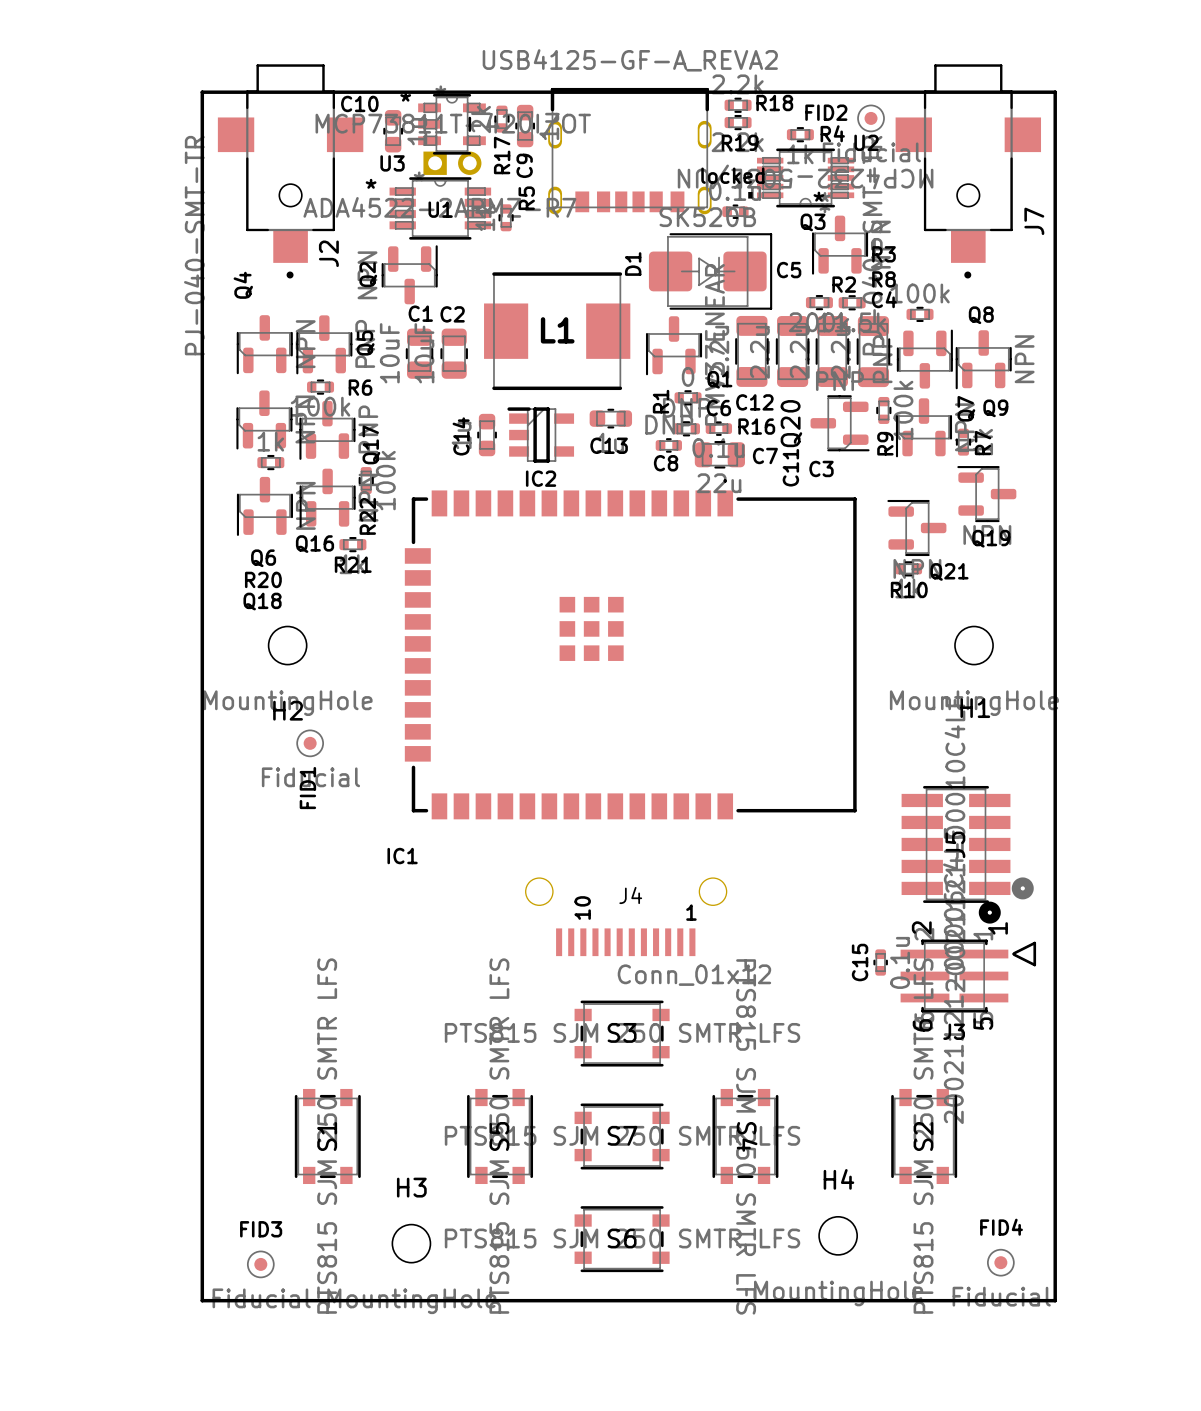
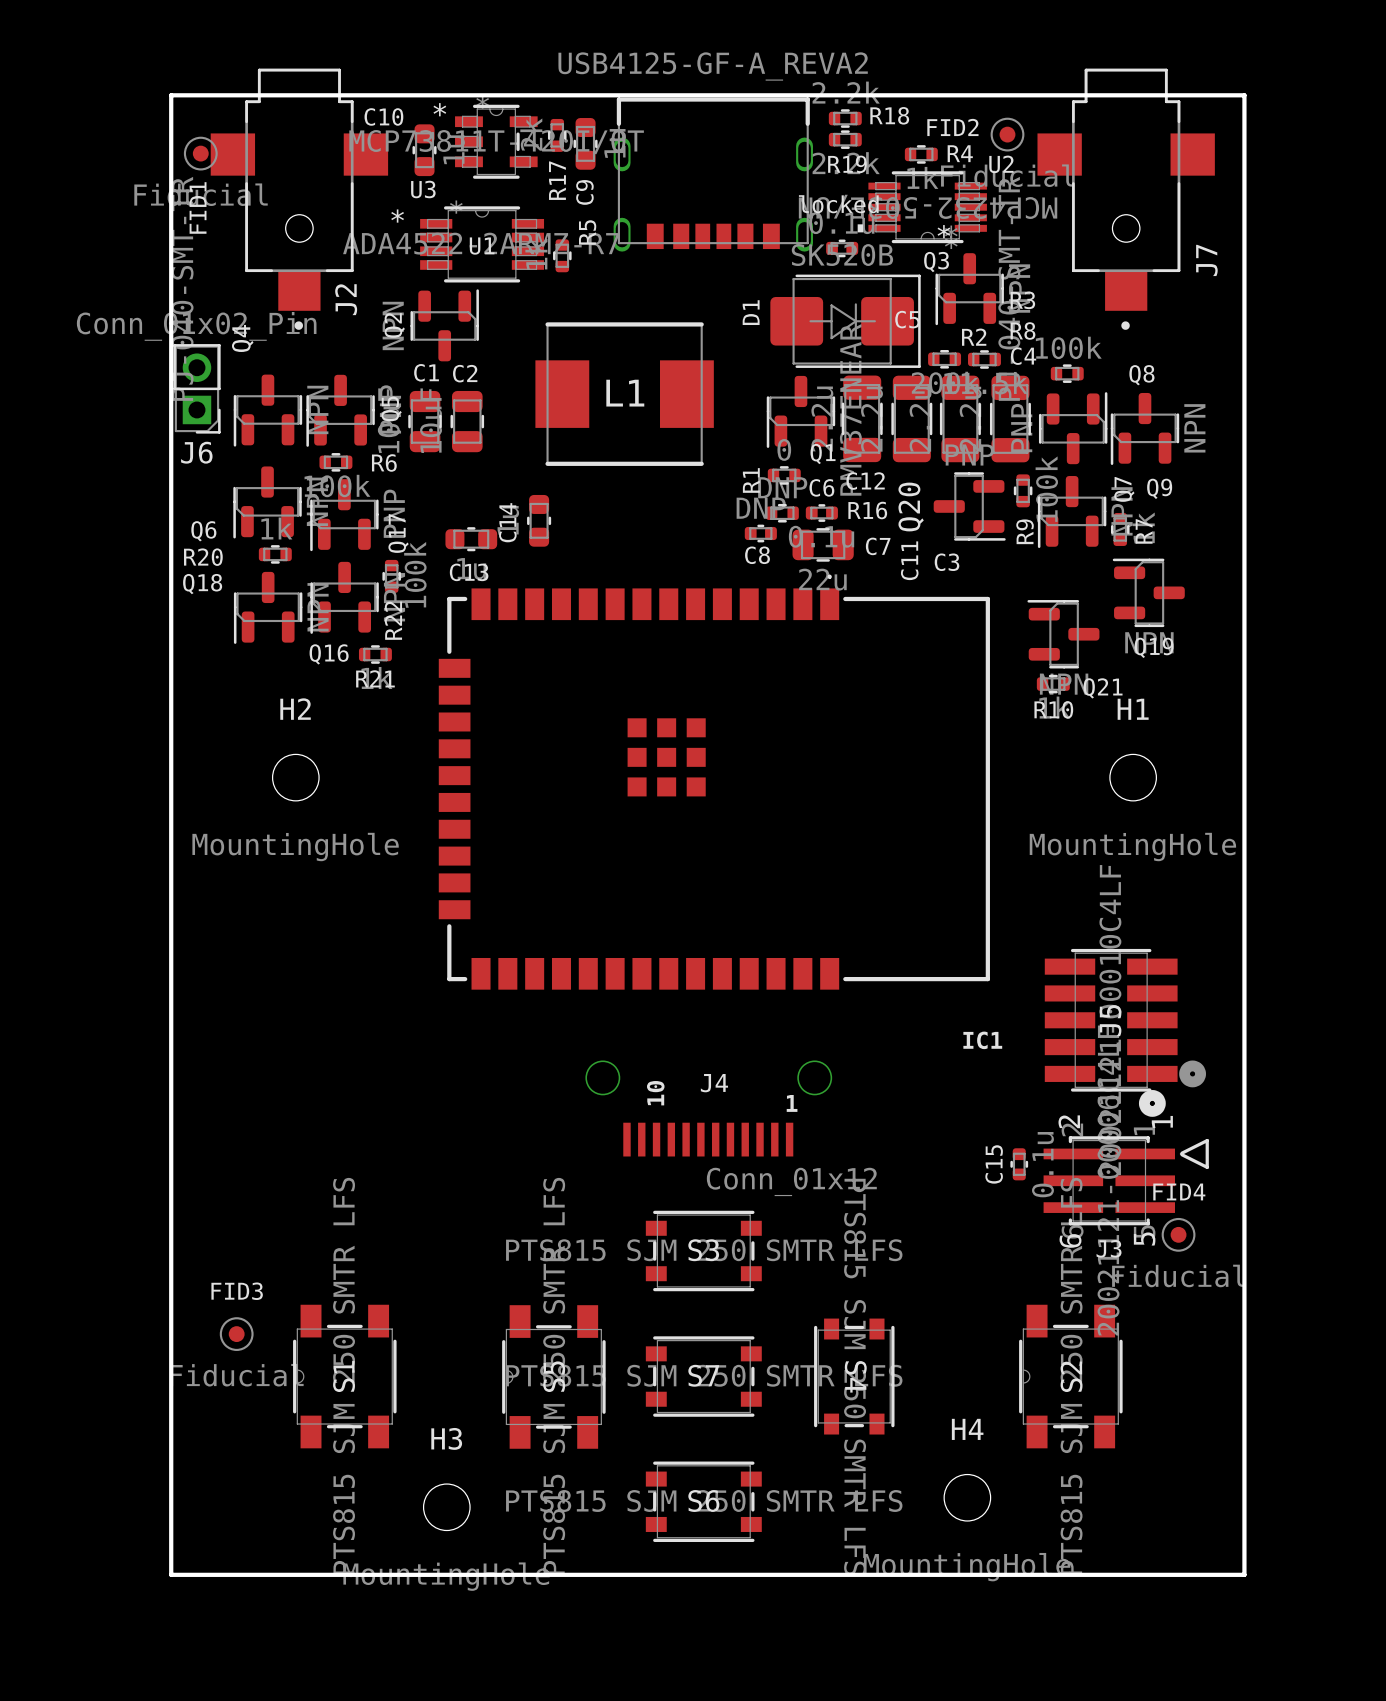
board edge: (202, 92) (1055, 92) (1055, 1300) (202, 1300) (202, 92) -> (171, 95) (171, 1574) (1244, 1574) (1244, 95) (171, 95)
J6 side: bottom (452, 163) -> top (196, 388)
D1 position: (710, 271) -> (845, 321)
Q1 position: (674, 345) -> (800, 411)
C1 position: (419, 353) -> (425, 421)
C2 position: (454, 353) -> (467, 421)
C13 position: (610, 418) -> (471, 539)
IC2: (540, 435) -> none
Q6 name position: Q6 (263, 558) -> Q6 (203, 531)
R20 name position: R20 (263, 579) -> R20 (203, 557)
Q18 name position: Q18 (262, 601) -> Q18 (202, 584)
H1 name position: H1 (975, 708) -> H1 (1133, 709)
H2 name position: H2 (288, 710) -> H2 (295, 709)
FID1 position: (310, 743) -> (200, 153)
IC1 name position: IC1 (402, 856) -> IC1 (982, 1040)
S1 footprint: [294, 1088, 361, 1185] -> [293, 1304, 397, 1449]
S5 footprint: [467, 1088, 534, 1185] -> [502, 1305, 606, 1449]
S2 footprint: [891, 1088, 958, 1185] -> [1019, 1304, 1123, 1449]
FID4 position: (1000, 1262) -> (1178, 1234)
FID3 position: (260, 1264) -> (236, 1334)

